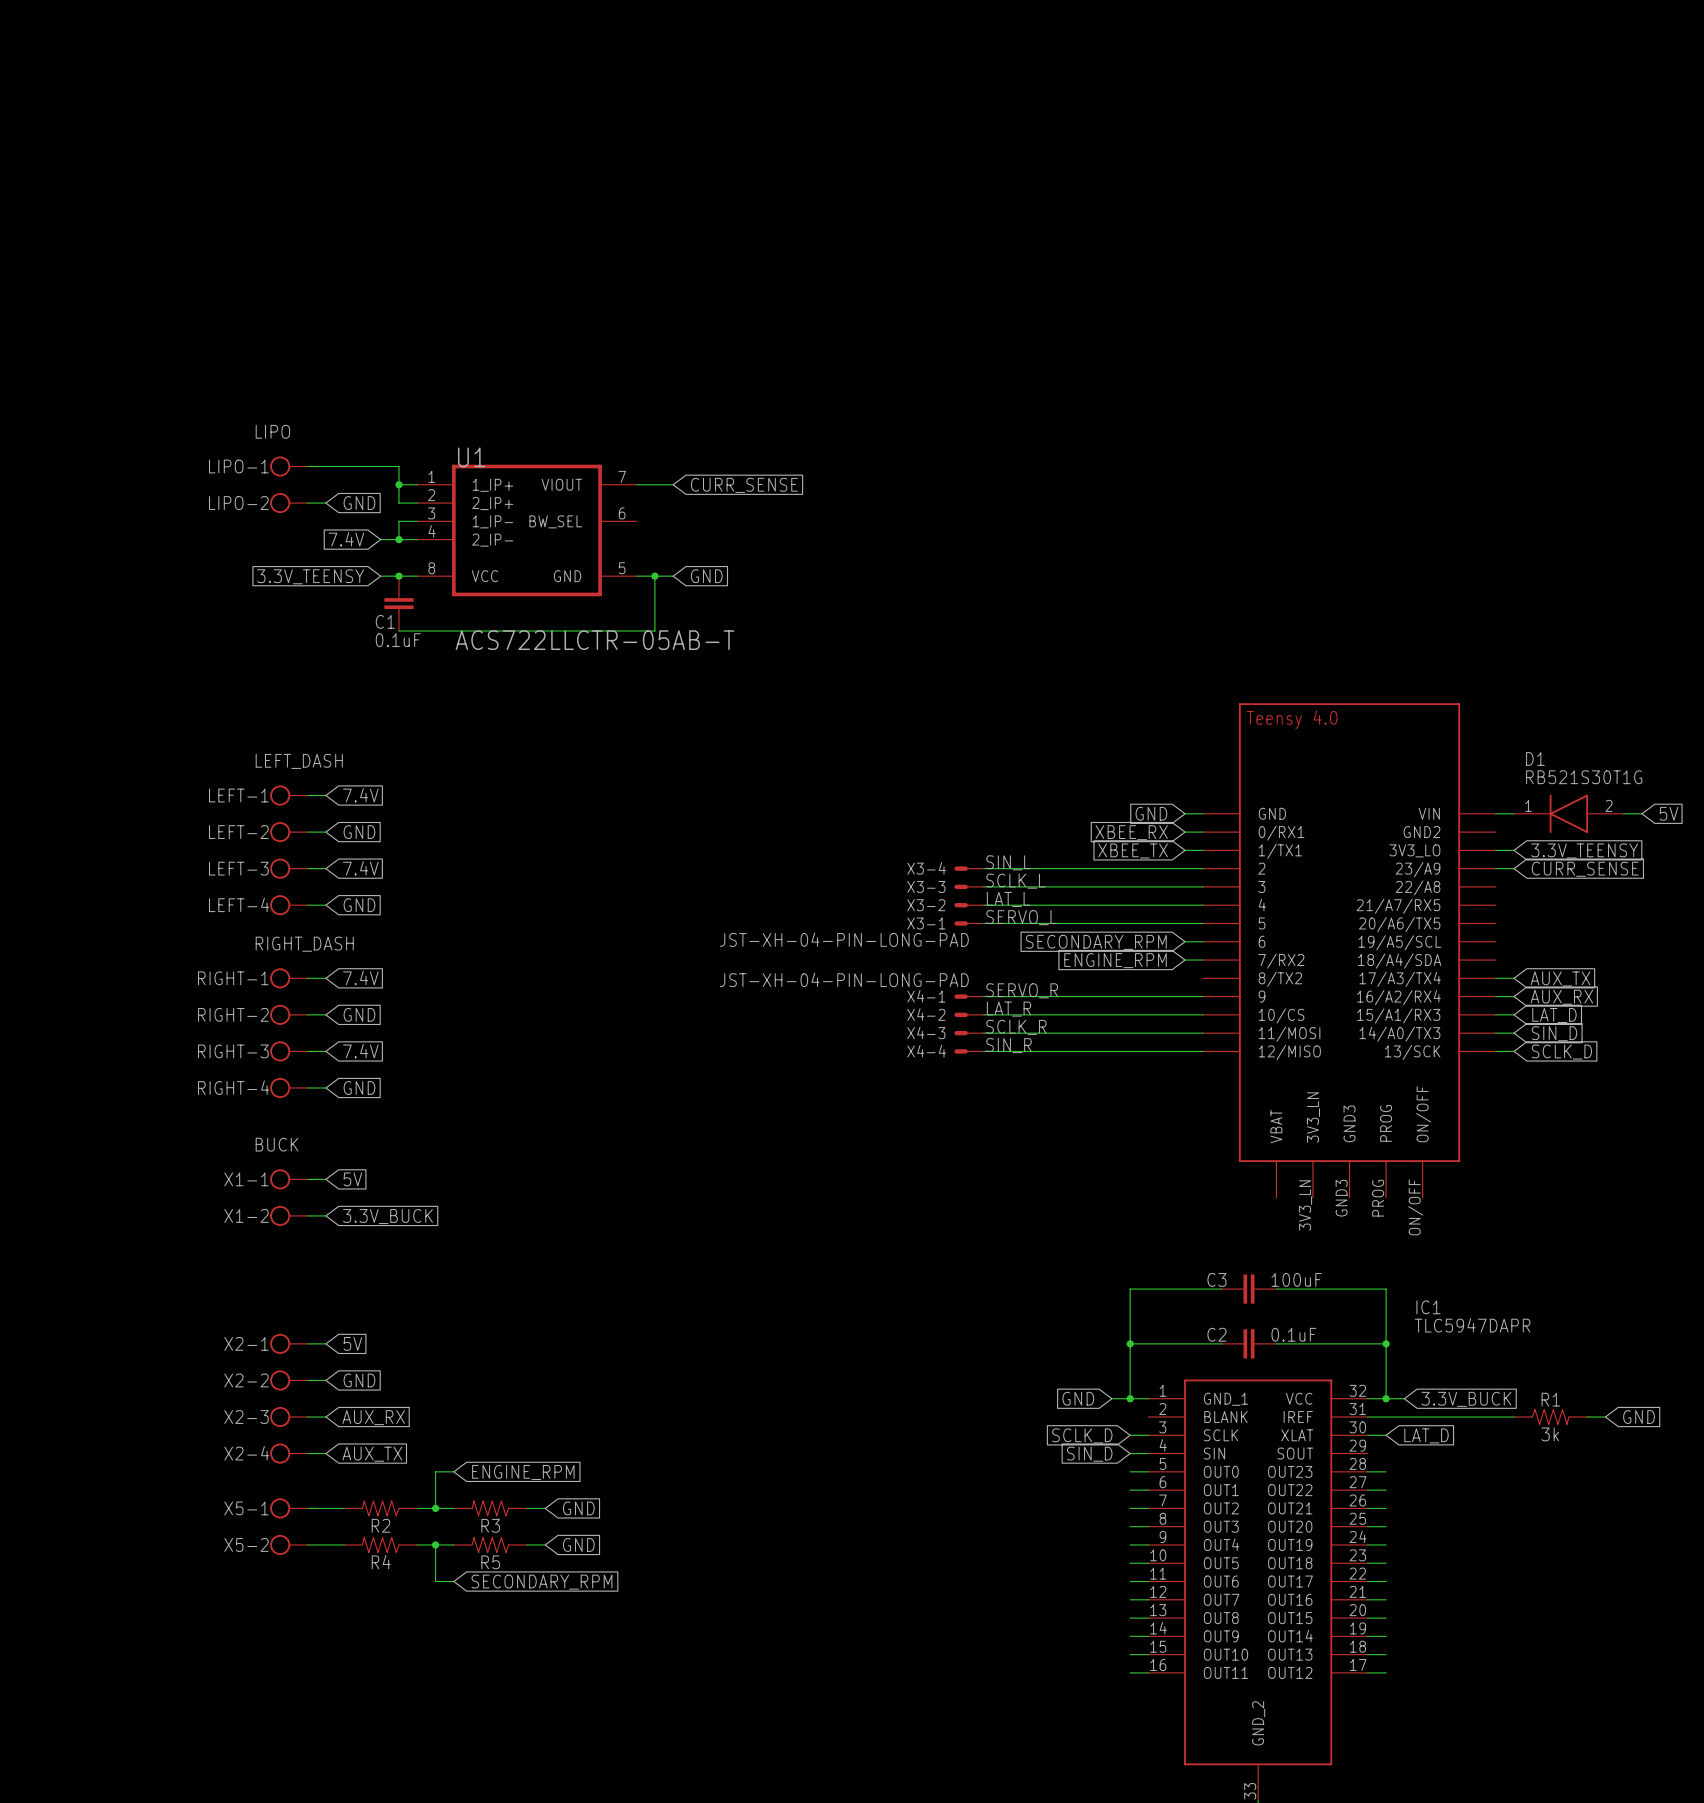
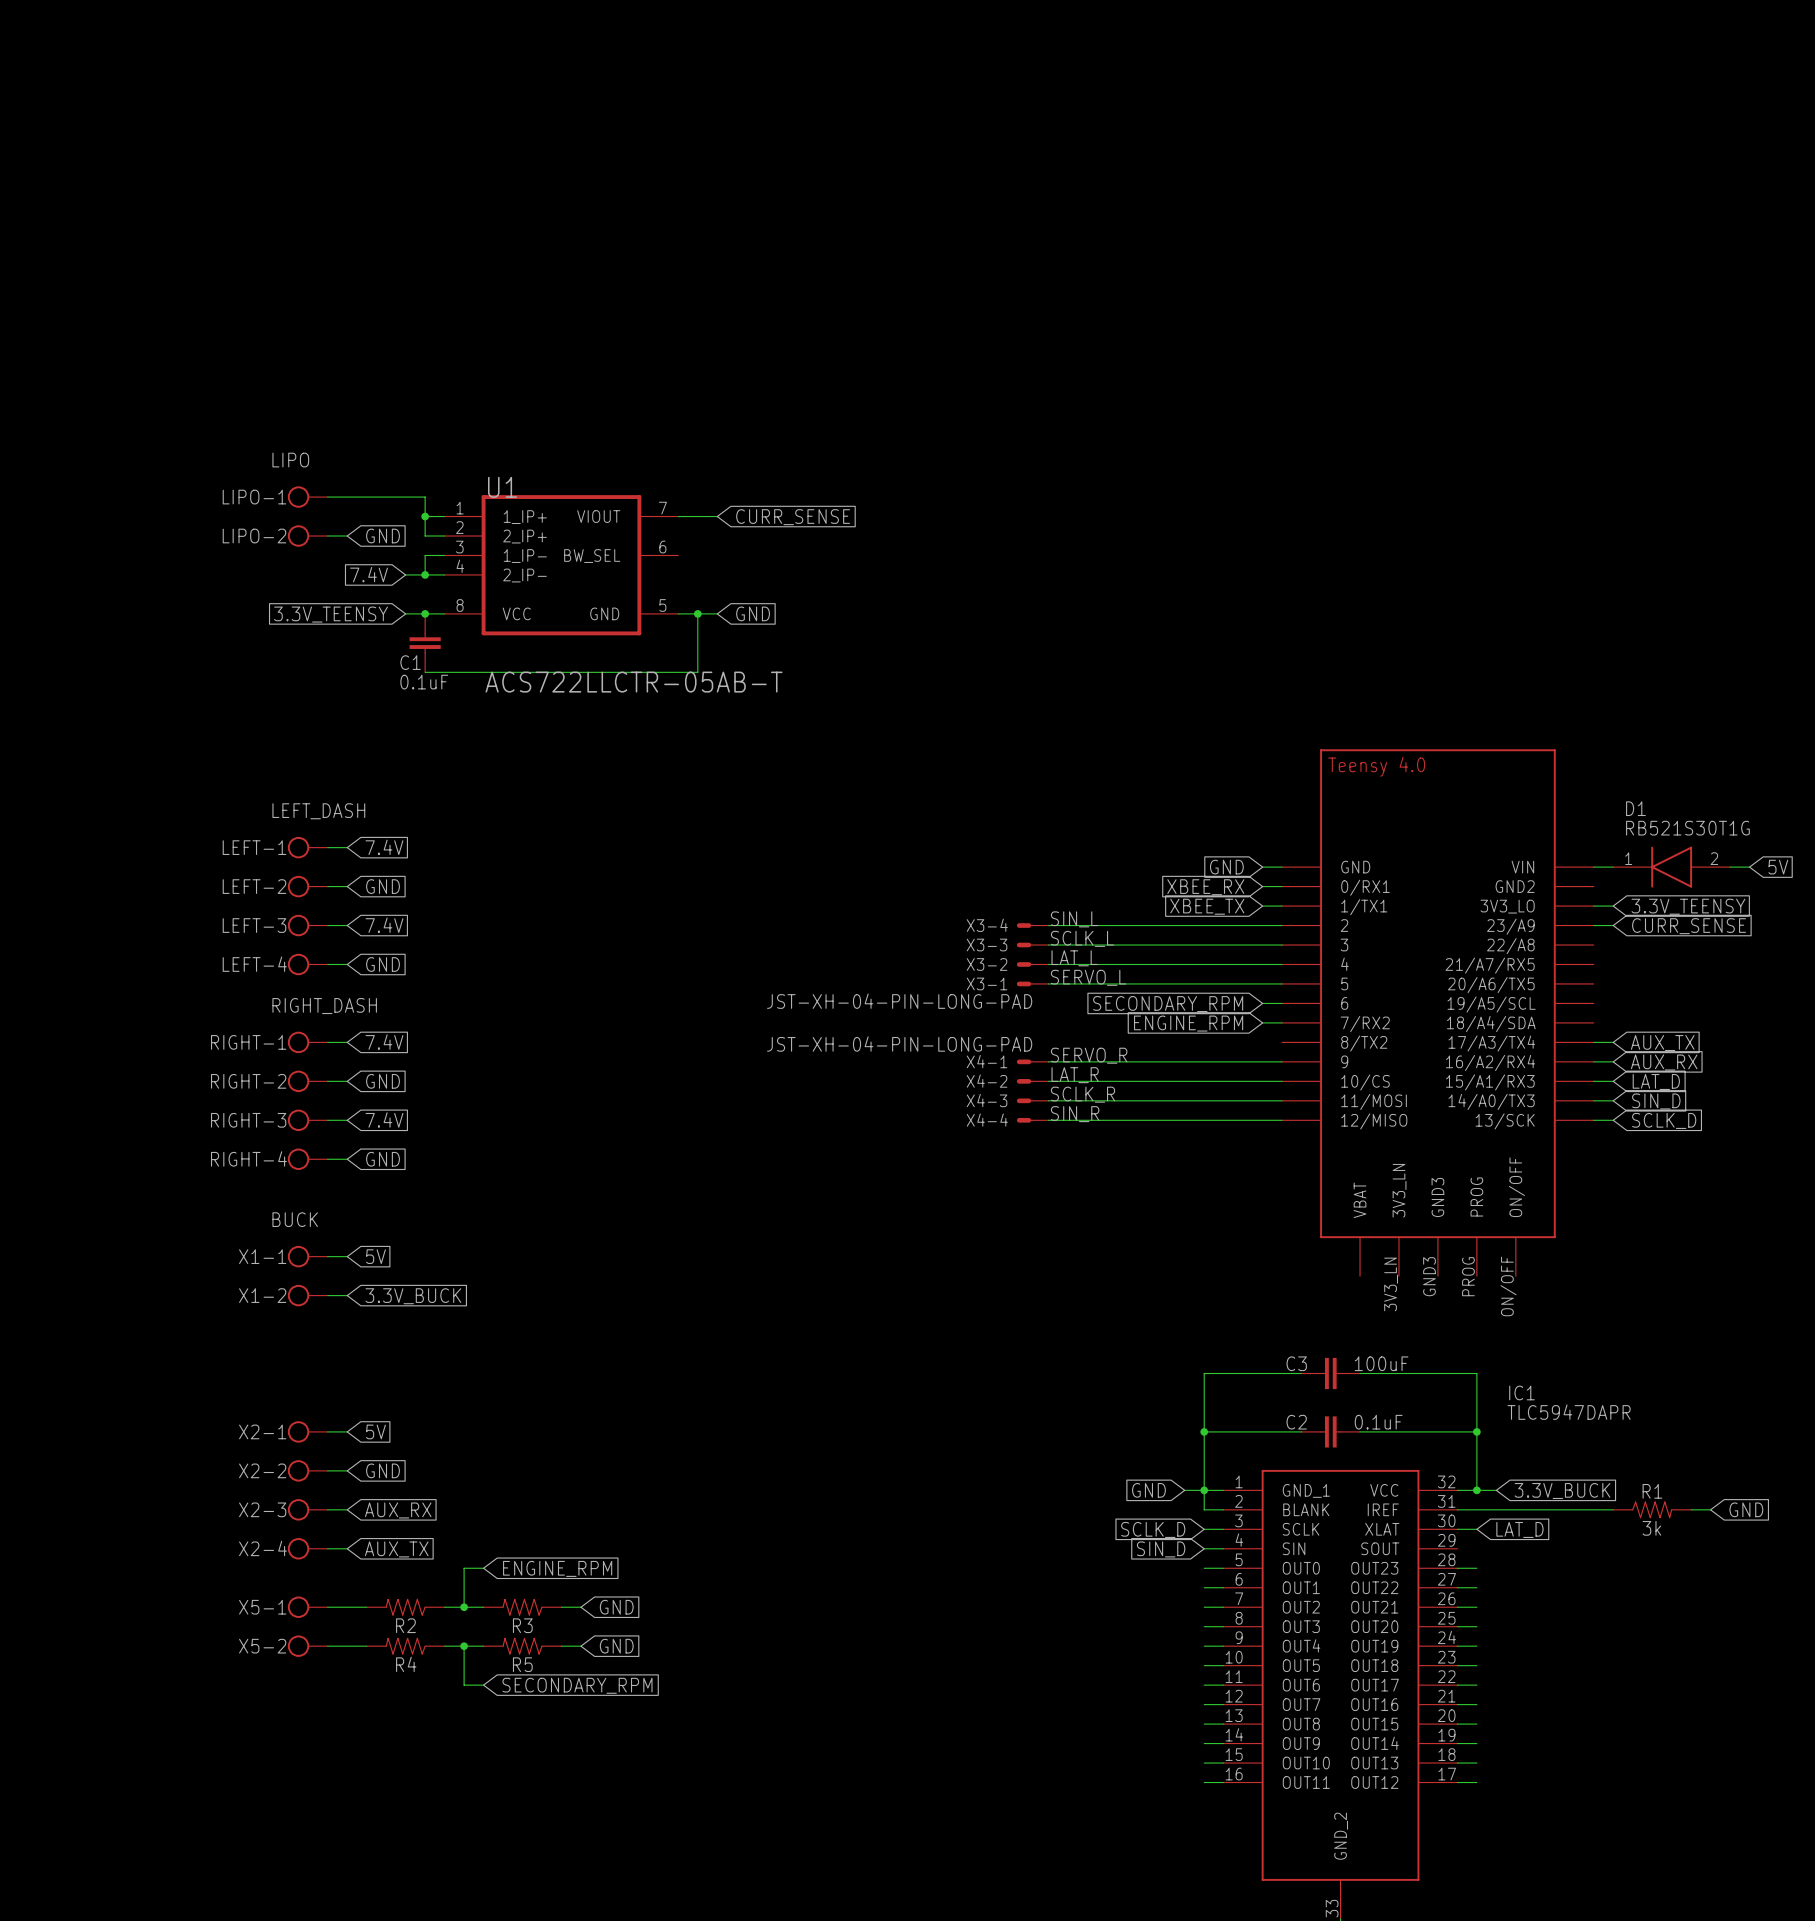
wire: none -> (1204, 1490) (1204, 1509) (1223, 1509)

